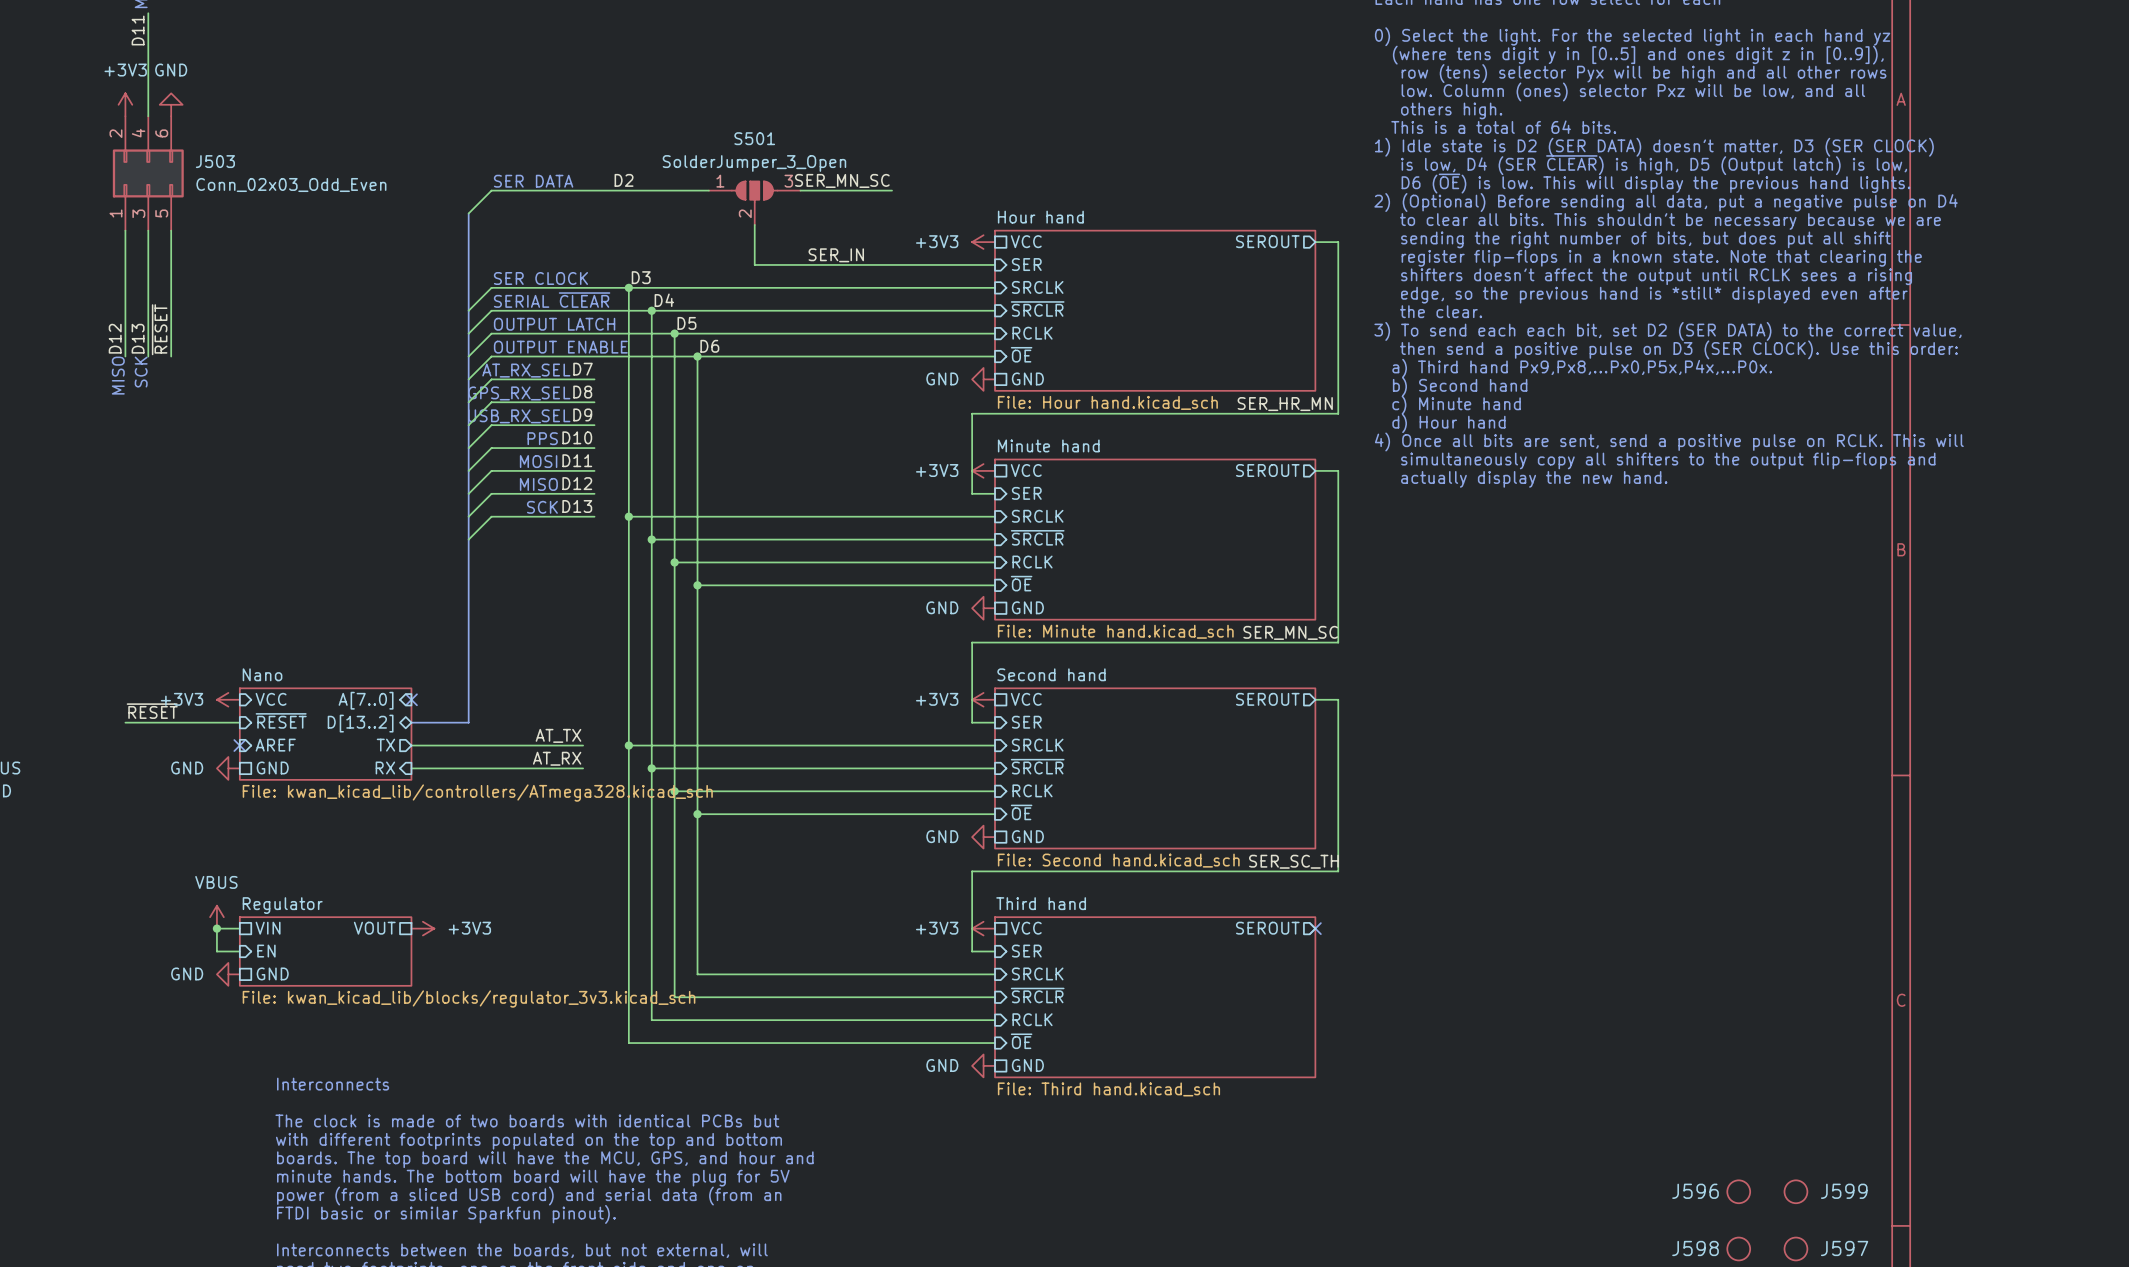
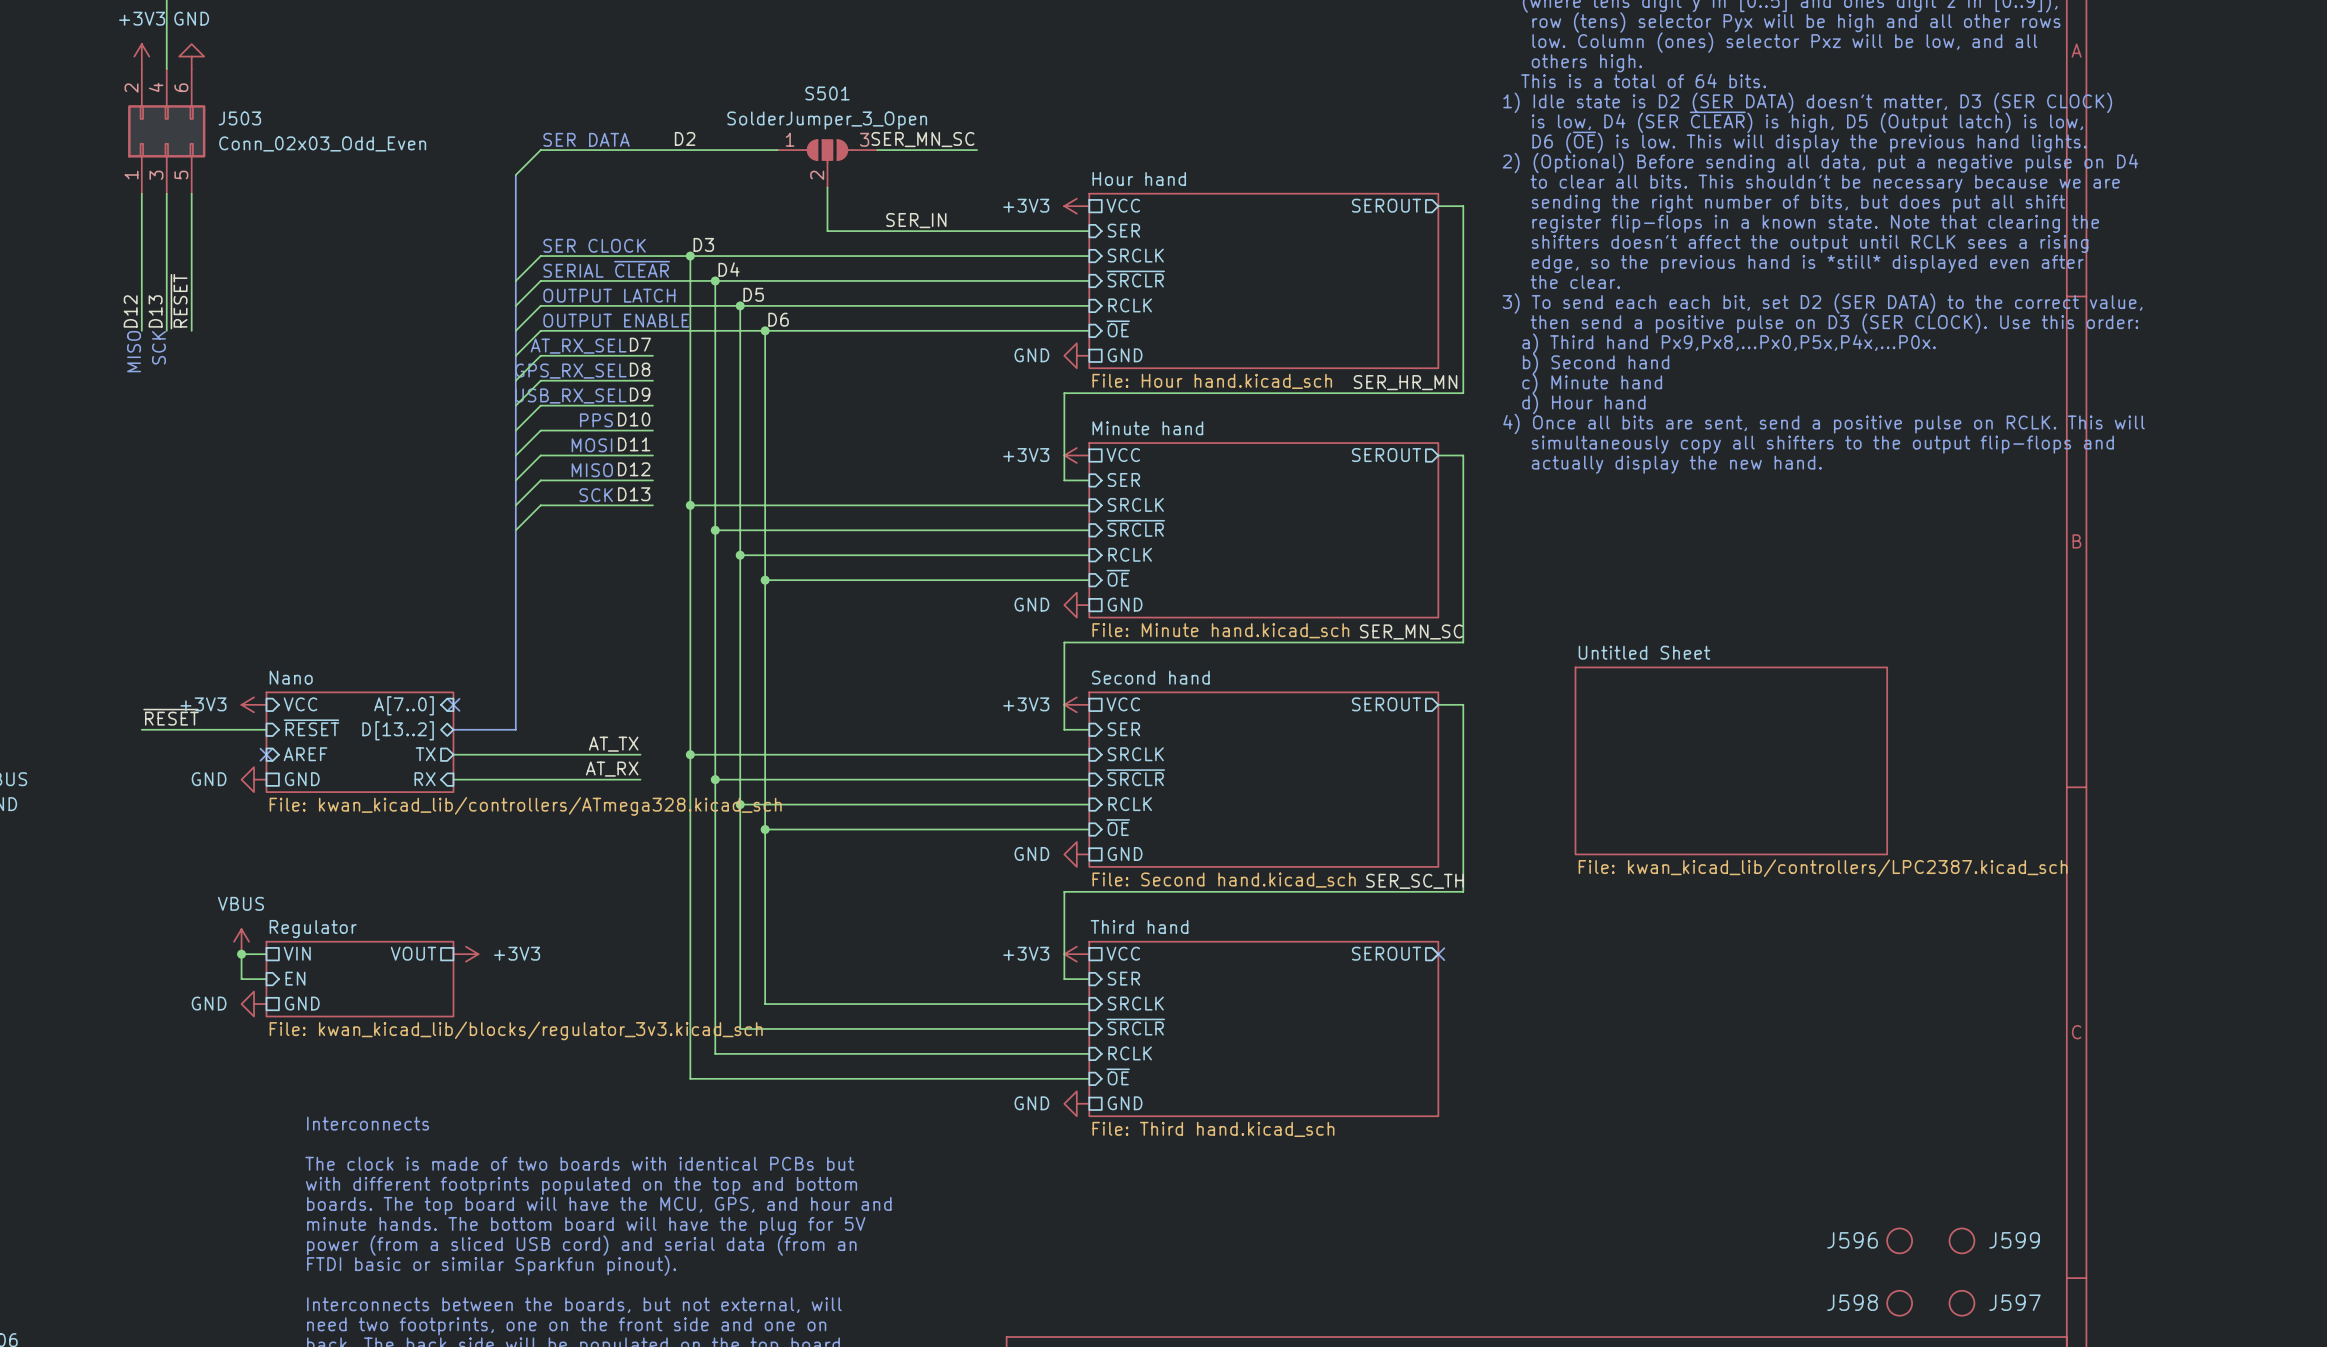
sheet Untitled Sheet: none -> File: kwan_kicad_lib/controllers/LPC2387.kicad_sch (1731, 760)

